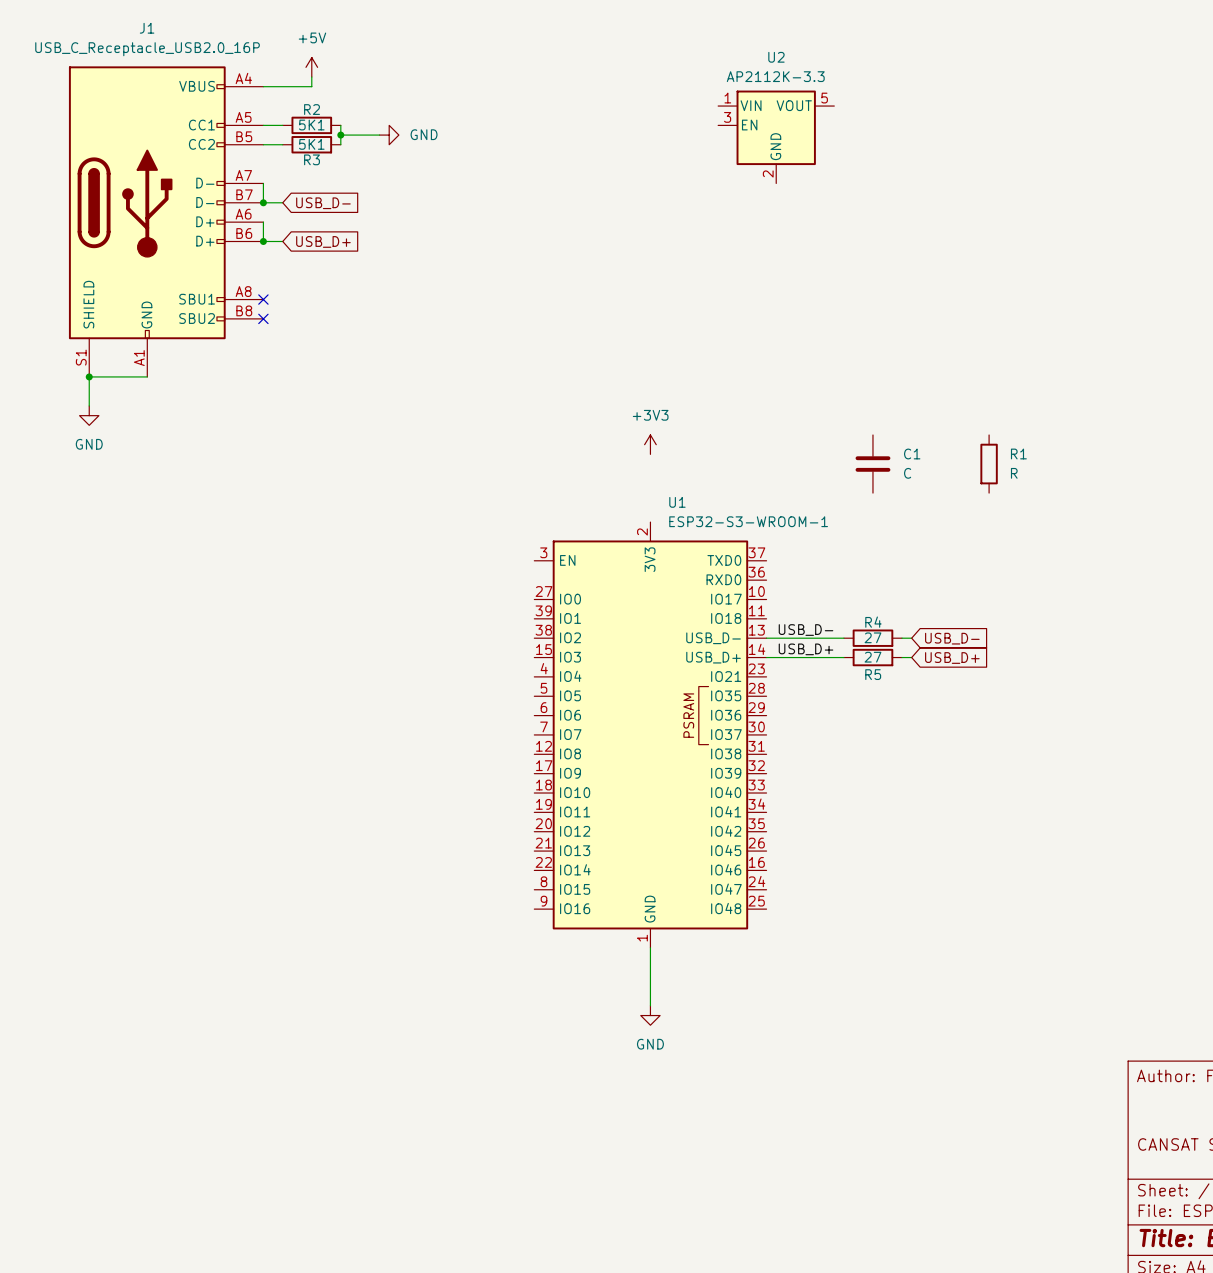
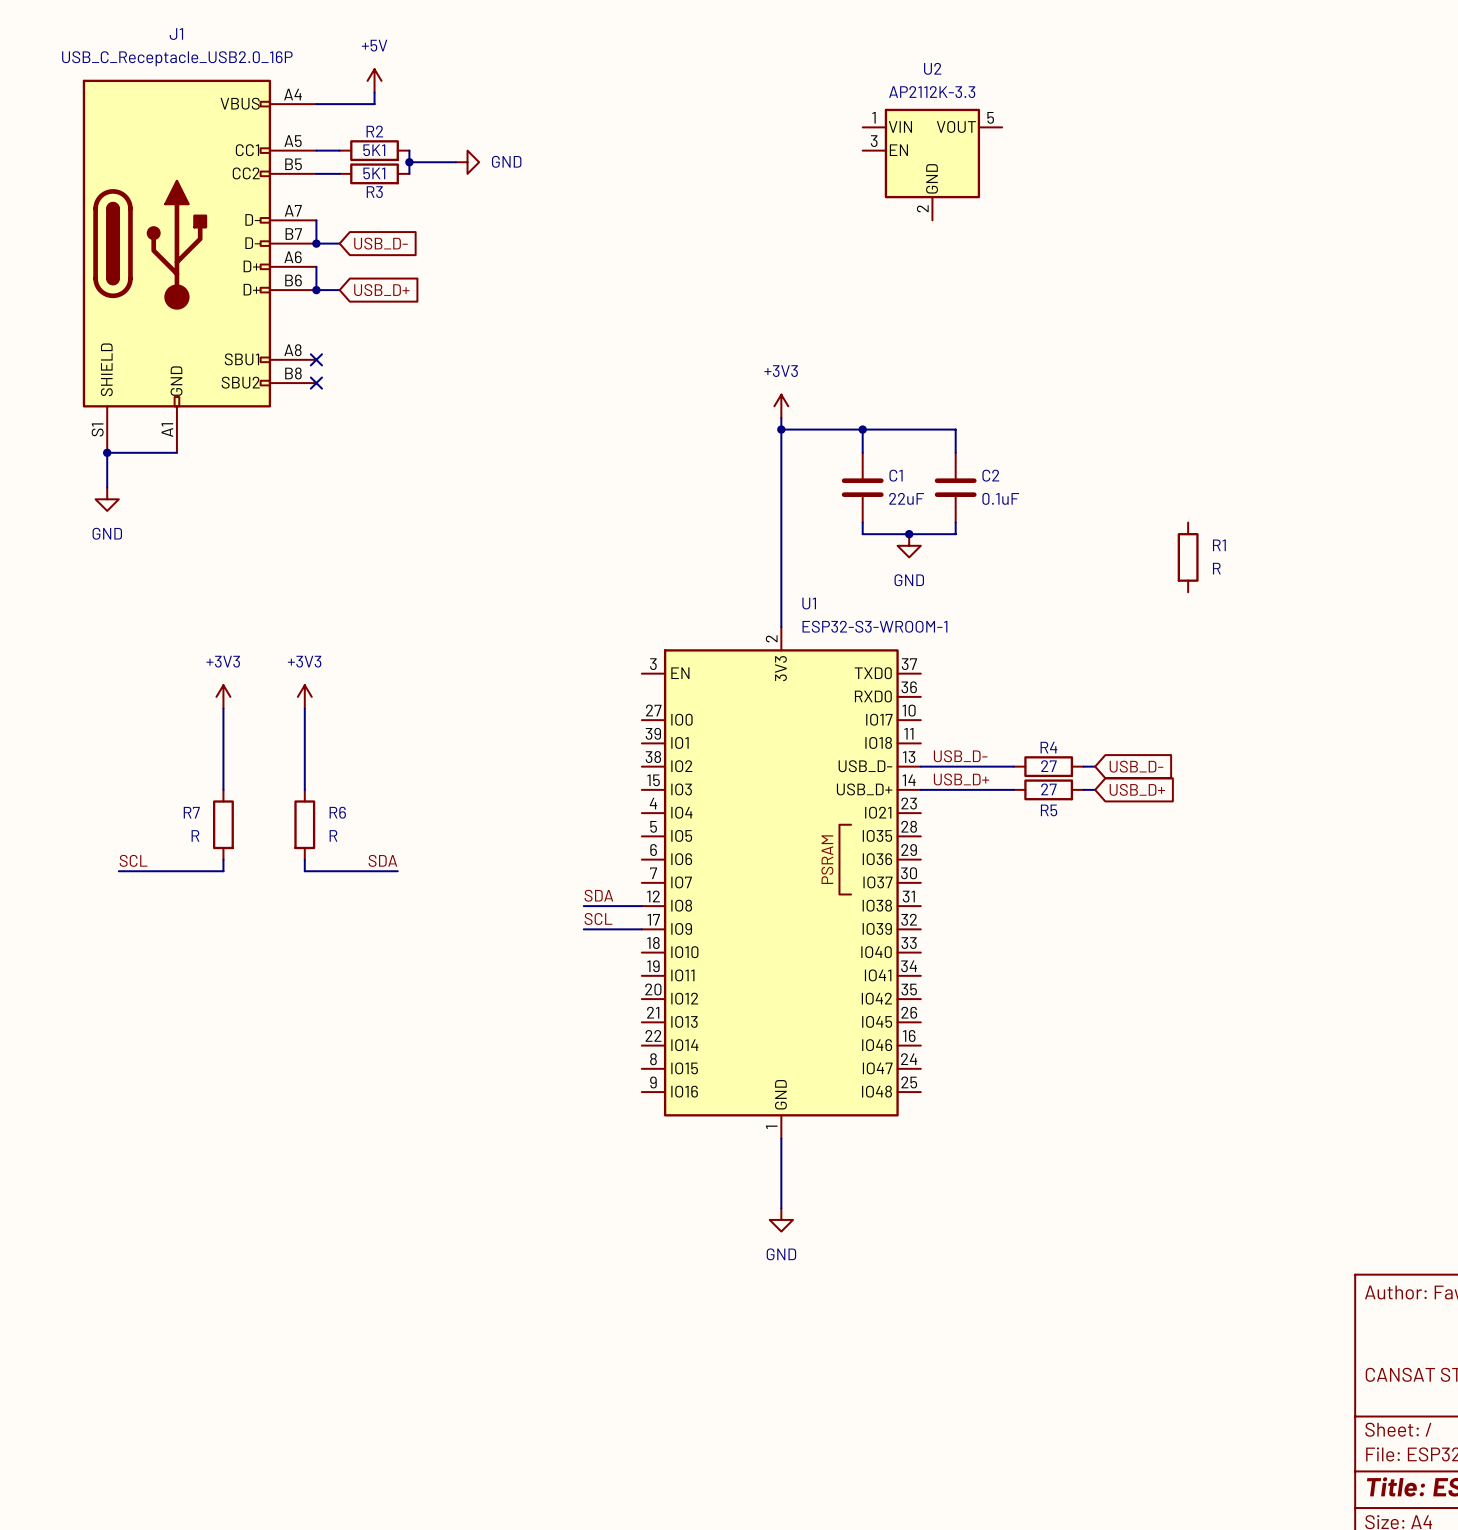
wire: none -> (781, 417) (781, 627)
wire: none -> (781, 429) (955, 429) (955, 452)
junction: none -> (781, 429)
wire: none -> (862, 429) (862, 452)
junction: none -> (862, 429)
C2: none -> 0.1uF (955, 487)
wire: none -> (862, 522) (862, 534) (955, 534) (955, 522)
power symbol position: +3V3 (650, 444) -> +3V3 (781, 406)
junction: none -> (909, 534)
C1 name position: C1 (912, 453) -> C1 (896, 475)
power symbol: none -> GND (909, 545)
C1 position: (872, 464) -> (862, 487)
C1 value: C (907, 473) -> 22uF (906, 498)
power symbol: none -> +3V3 (223, 696)
power symbol: none -> +3V3 (304, 696)
wire: none -> (223, 708) (223, 789)
wire: none -> (304, 708) (304, 789)
R7: none -> R (223, 824)
R6: none -> R (304, 824)
wire: none -> (223, 859) (223, 871) (118, 871)
wire: none -> (304, 859) (304, 871) (397, 871)
label: none -> SCL (133, 860)
label: none -> SDA (382, 860)
label: none -> SDA (598, 895)
wire: none -> (583, 906) (641, 906)
label: none -> SCL (598, 918)
wire: none -> (583, 929) (641, 929)

